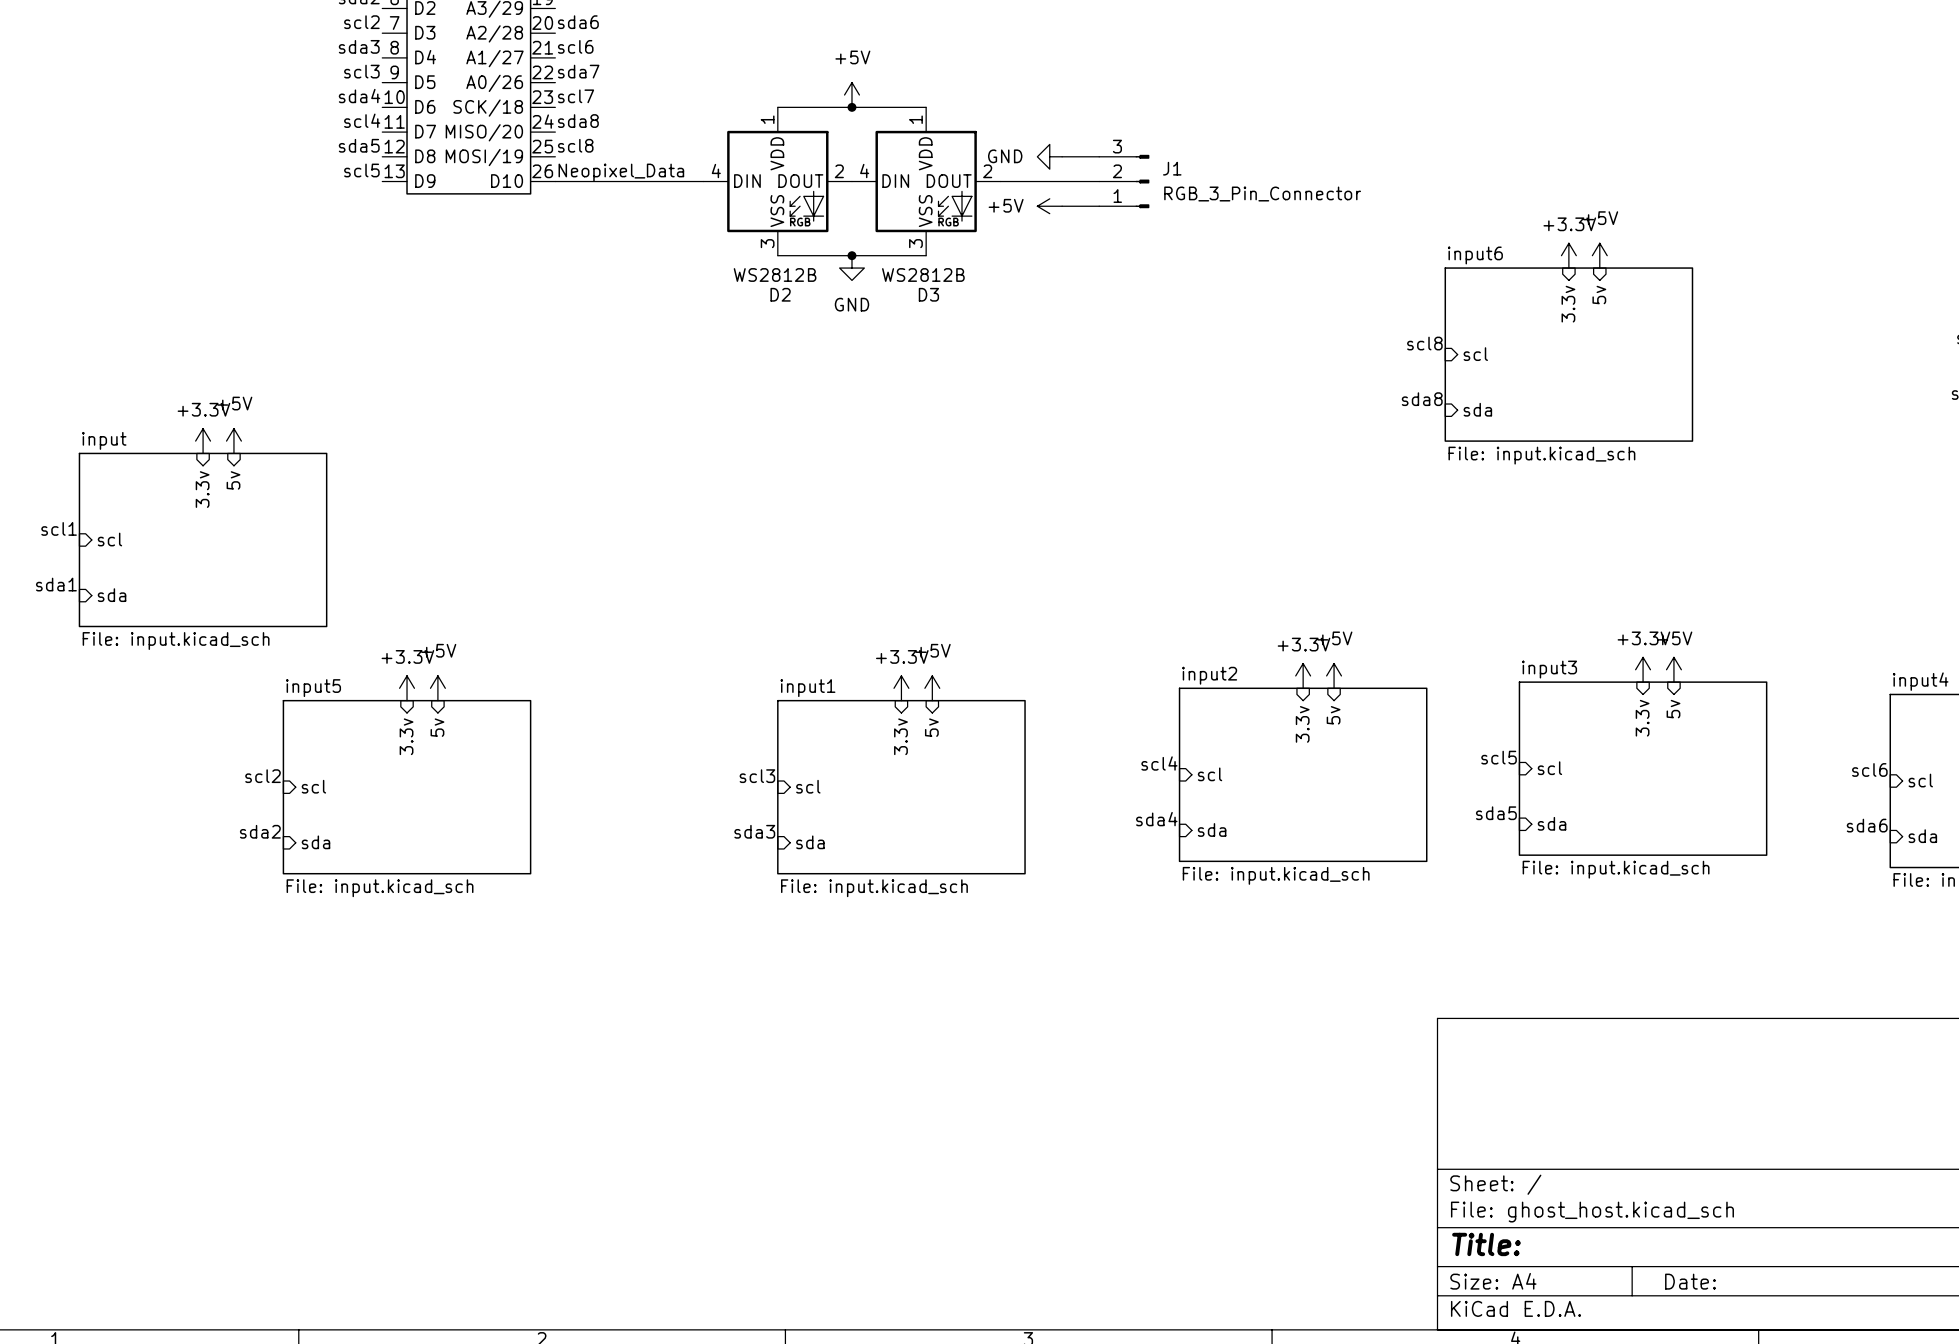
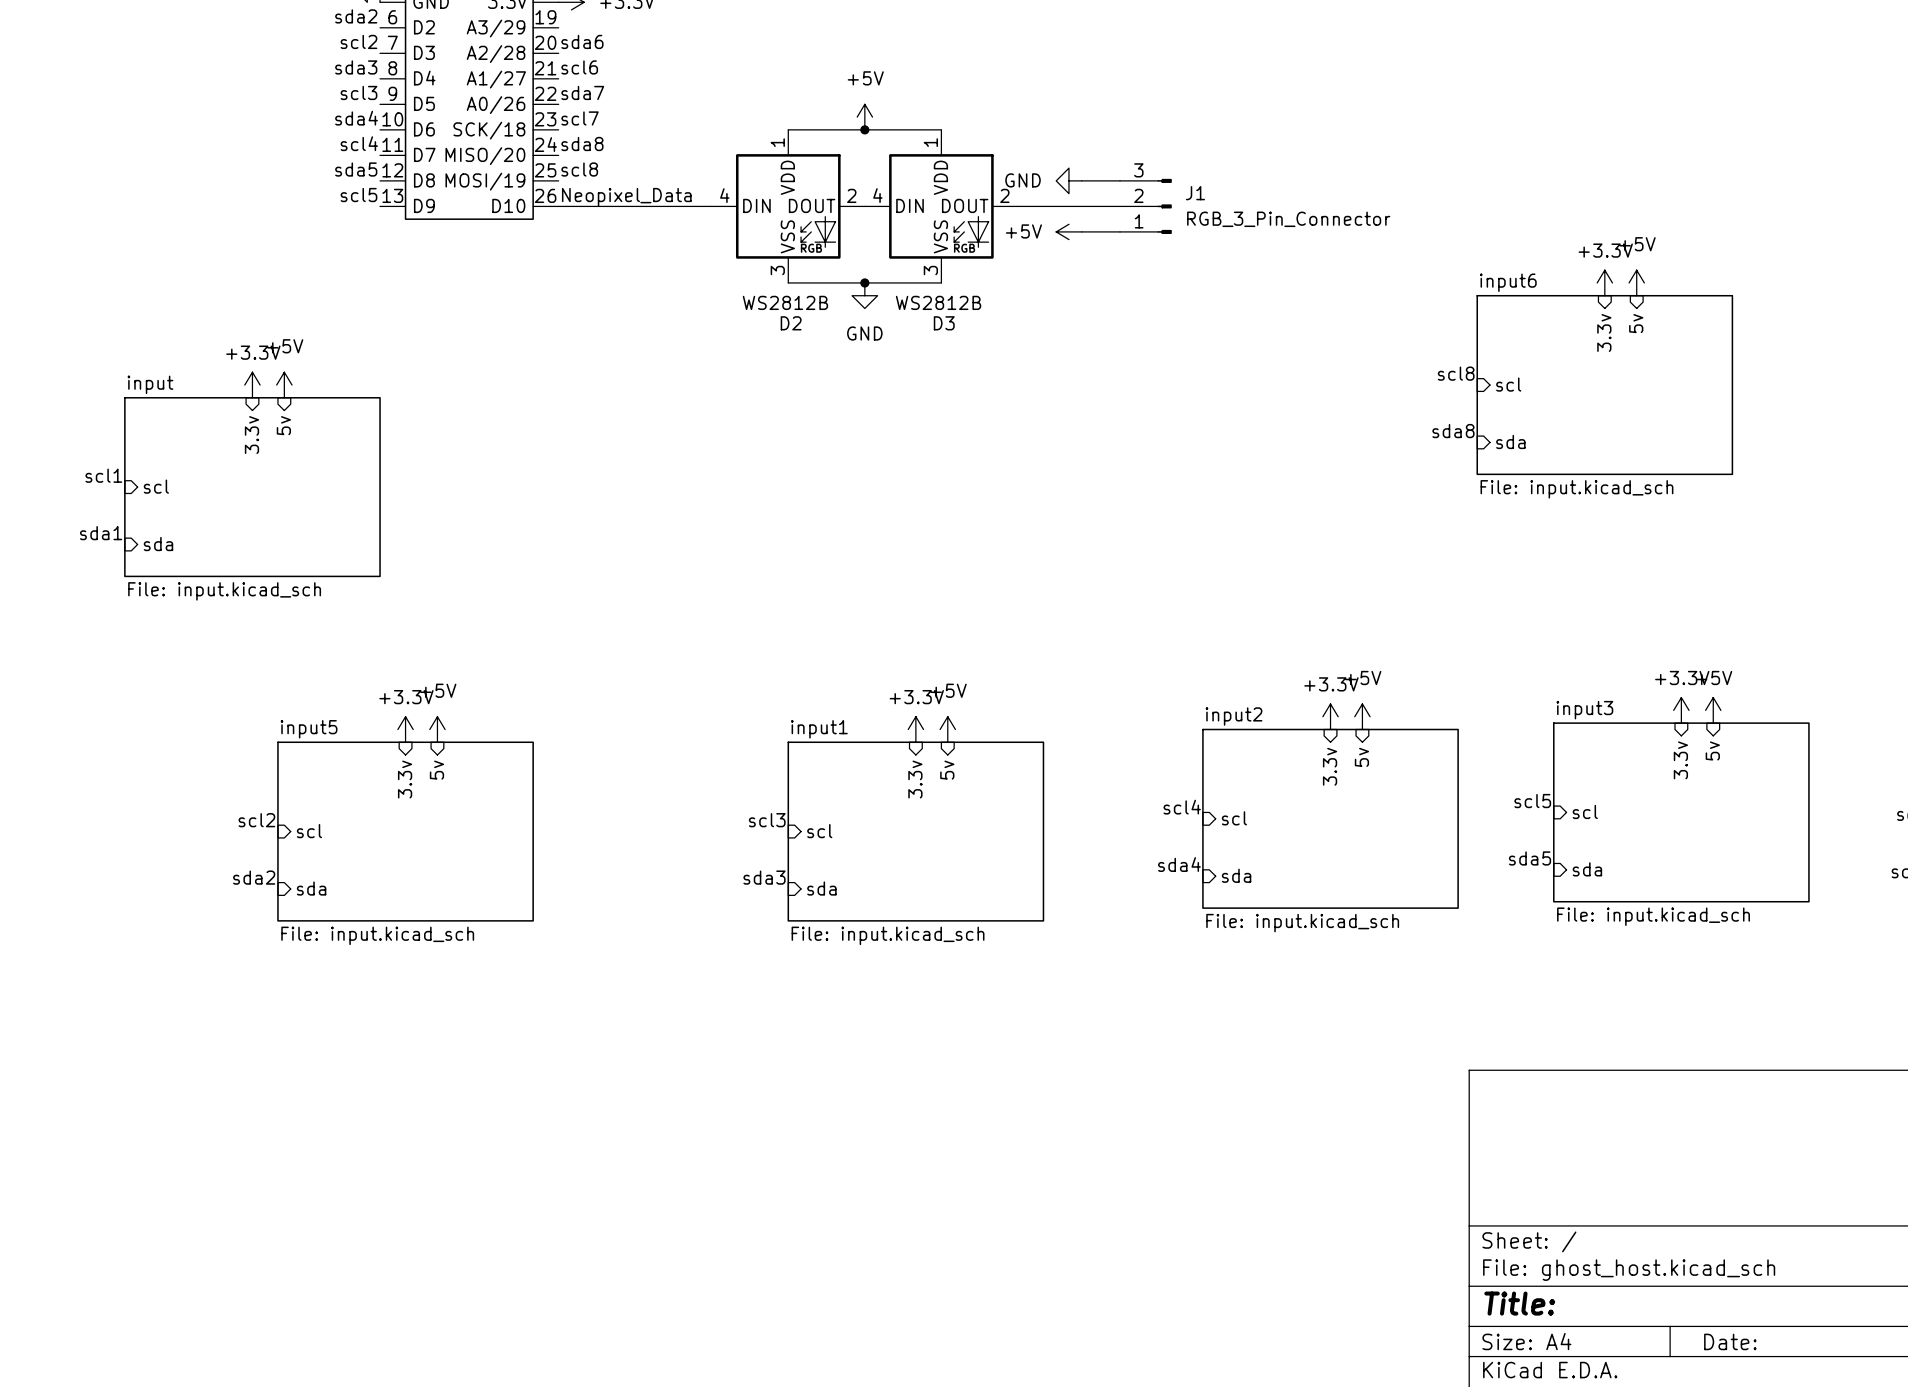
power symbol position: +3.3V (203, 441) -> +3.3V (252, 385)
power symbol position: +5V (233, 441) -> +5V (284, 385)
sheet pin position: 5v (233, 480) -> 5v (283, 425)
sheet pin position: 3.3v (202, 489) -> 3.3v (251, 435)
label position: scl1 (59, 528) -> scl1 (103, 475)
sheet pin position: scl (109, 539) -> scl (156, 486)
sheet input position: (203, 539) -> (252, 487)
label position: sda1 (56, 584) -> sda1 (101, 533)
sheet pin position: sda (112, 595) -> sda (158, 544)

